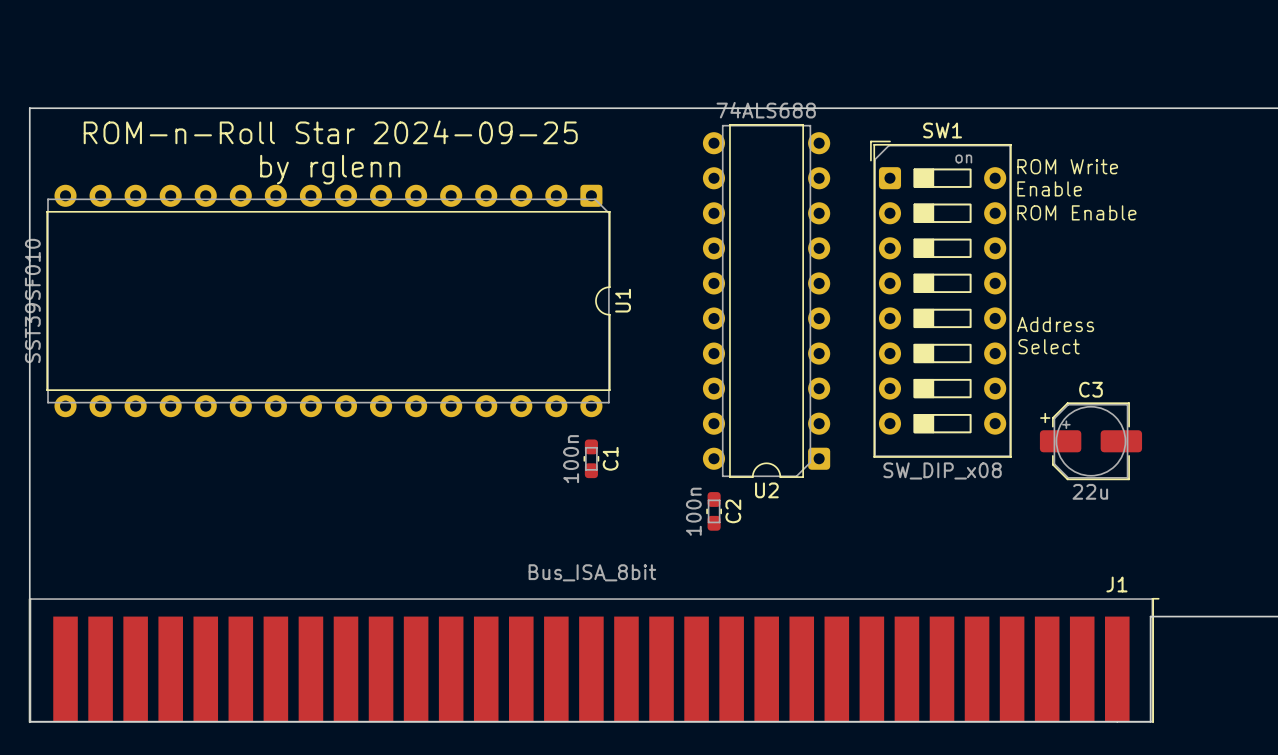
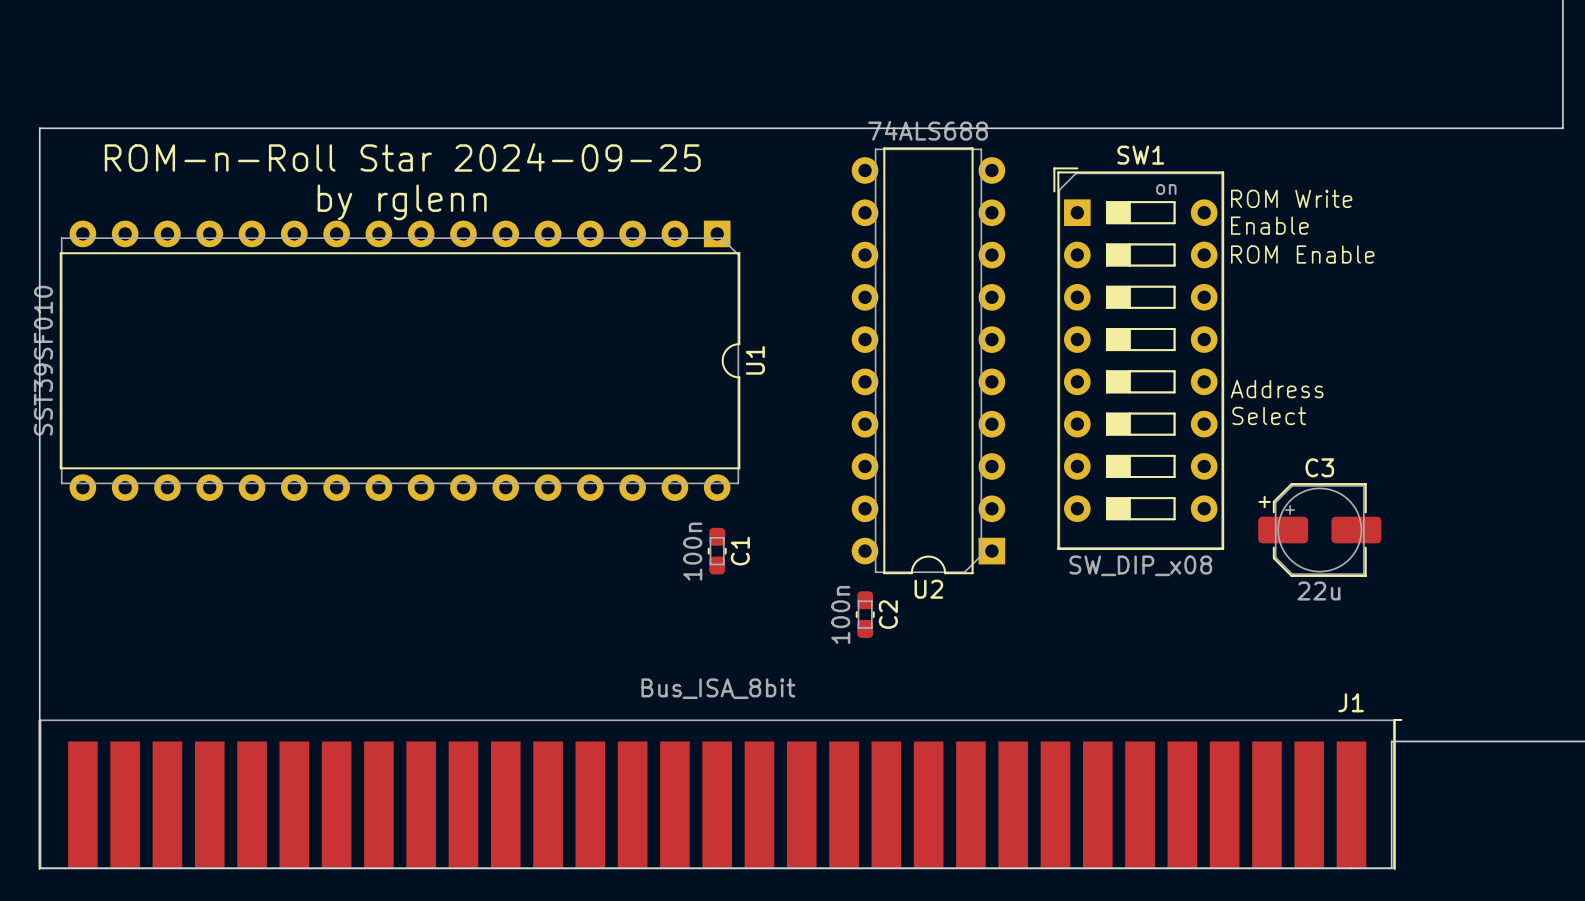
U2 footprint: [702, 124, 831, 478] -> [851, 147, 1006, 575]
SW1 footprint: [870, 140, 1012, 458] -> [1053, 167, 1225, 551]
U1 footprint: [46, 184, 611, 418] -> [59, 220, 741, 501]

